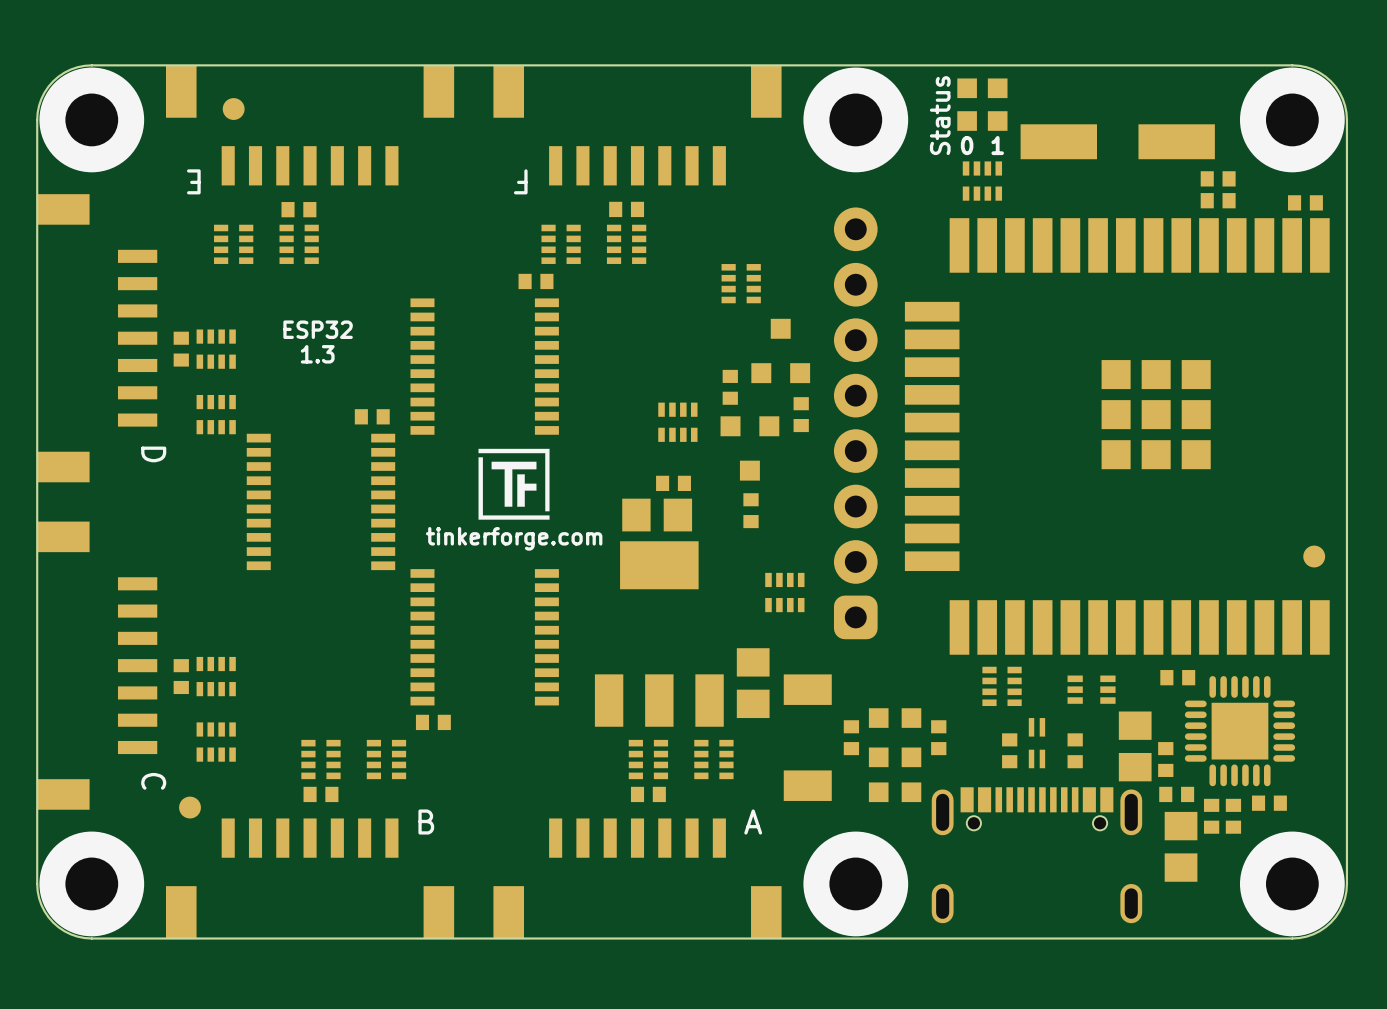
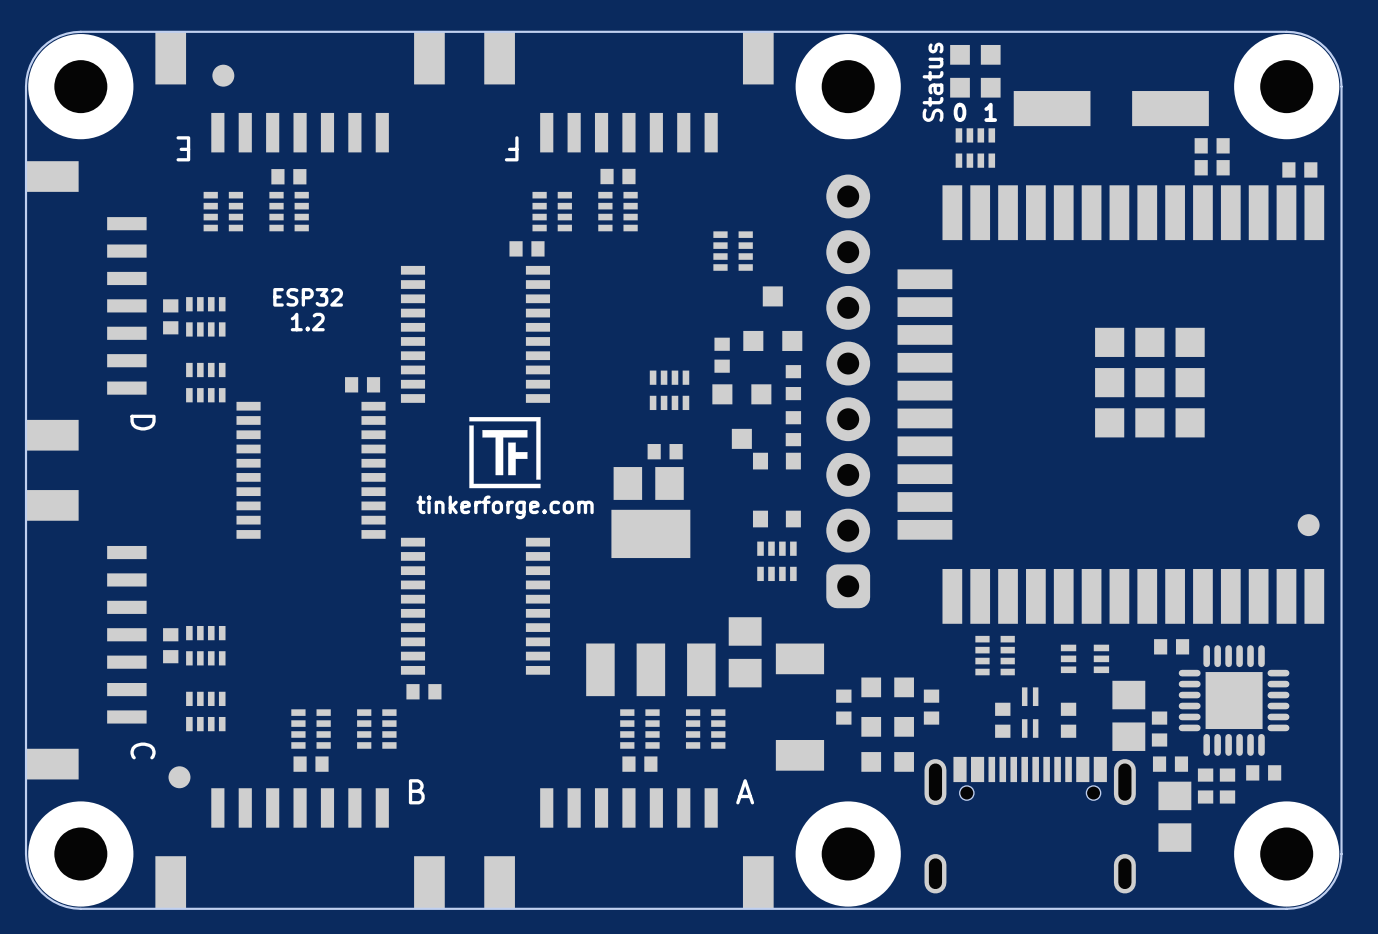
text: 1.3 (317, 354) -> 1.2 (307, 322)
part: none -> (793, 428)
part footprint: [743, 493, 759, 529] -> [752, 452, 769, 528]
part: none -> (793, 490)

